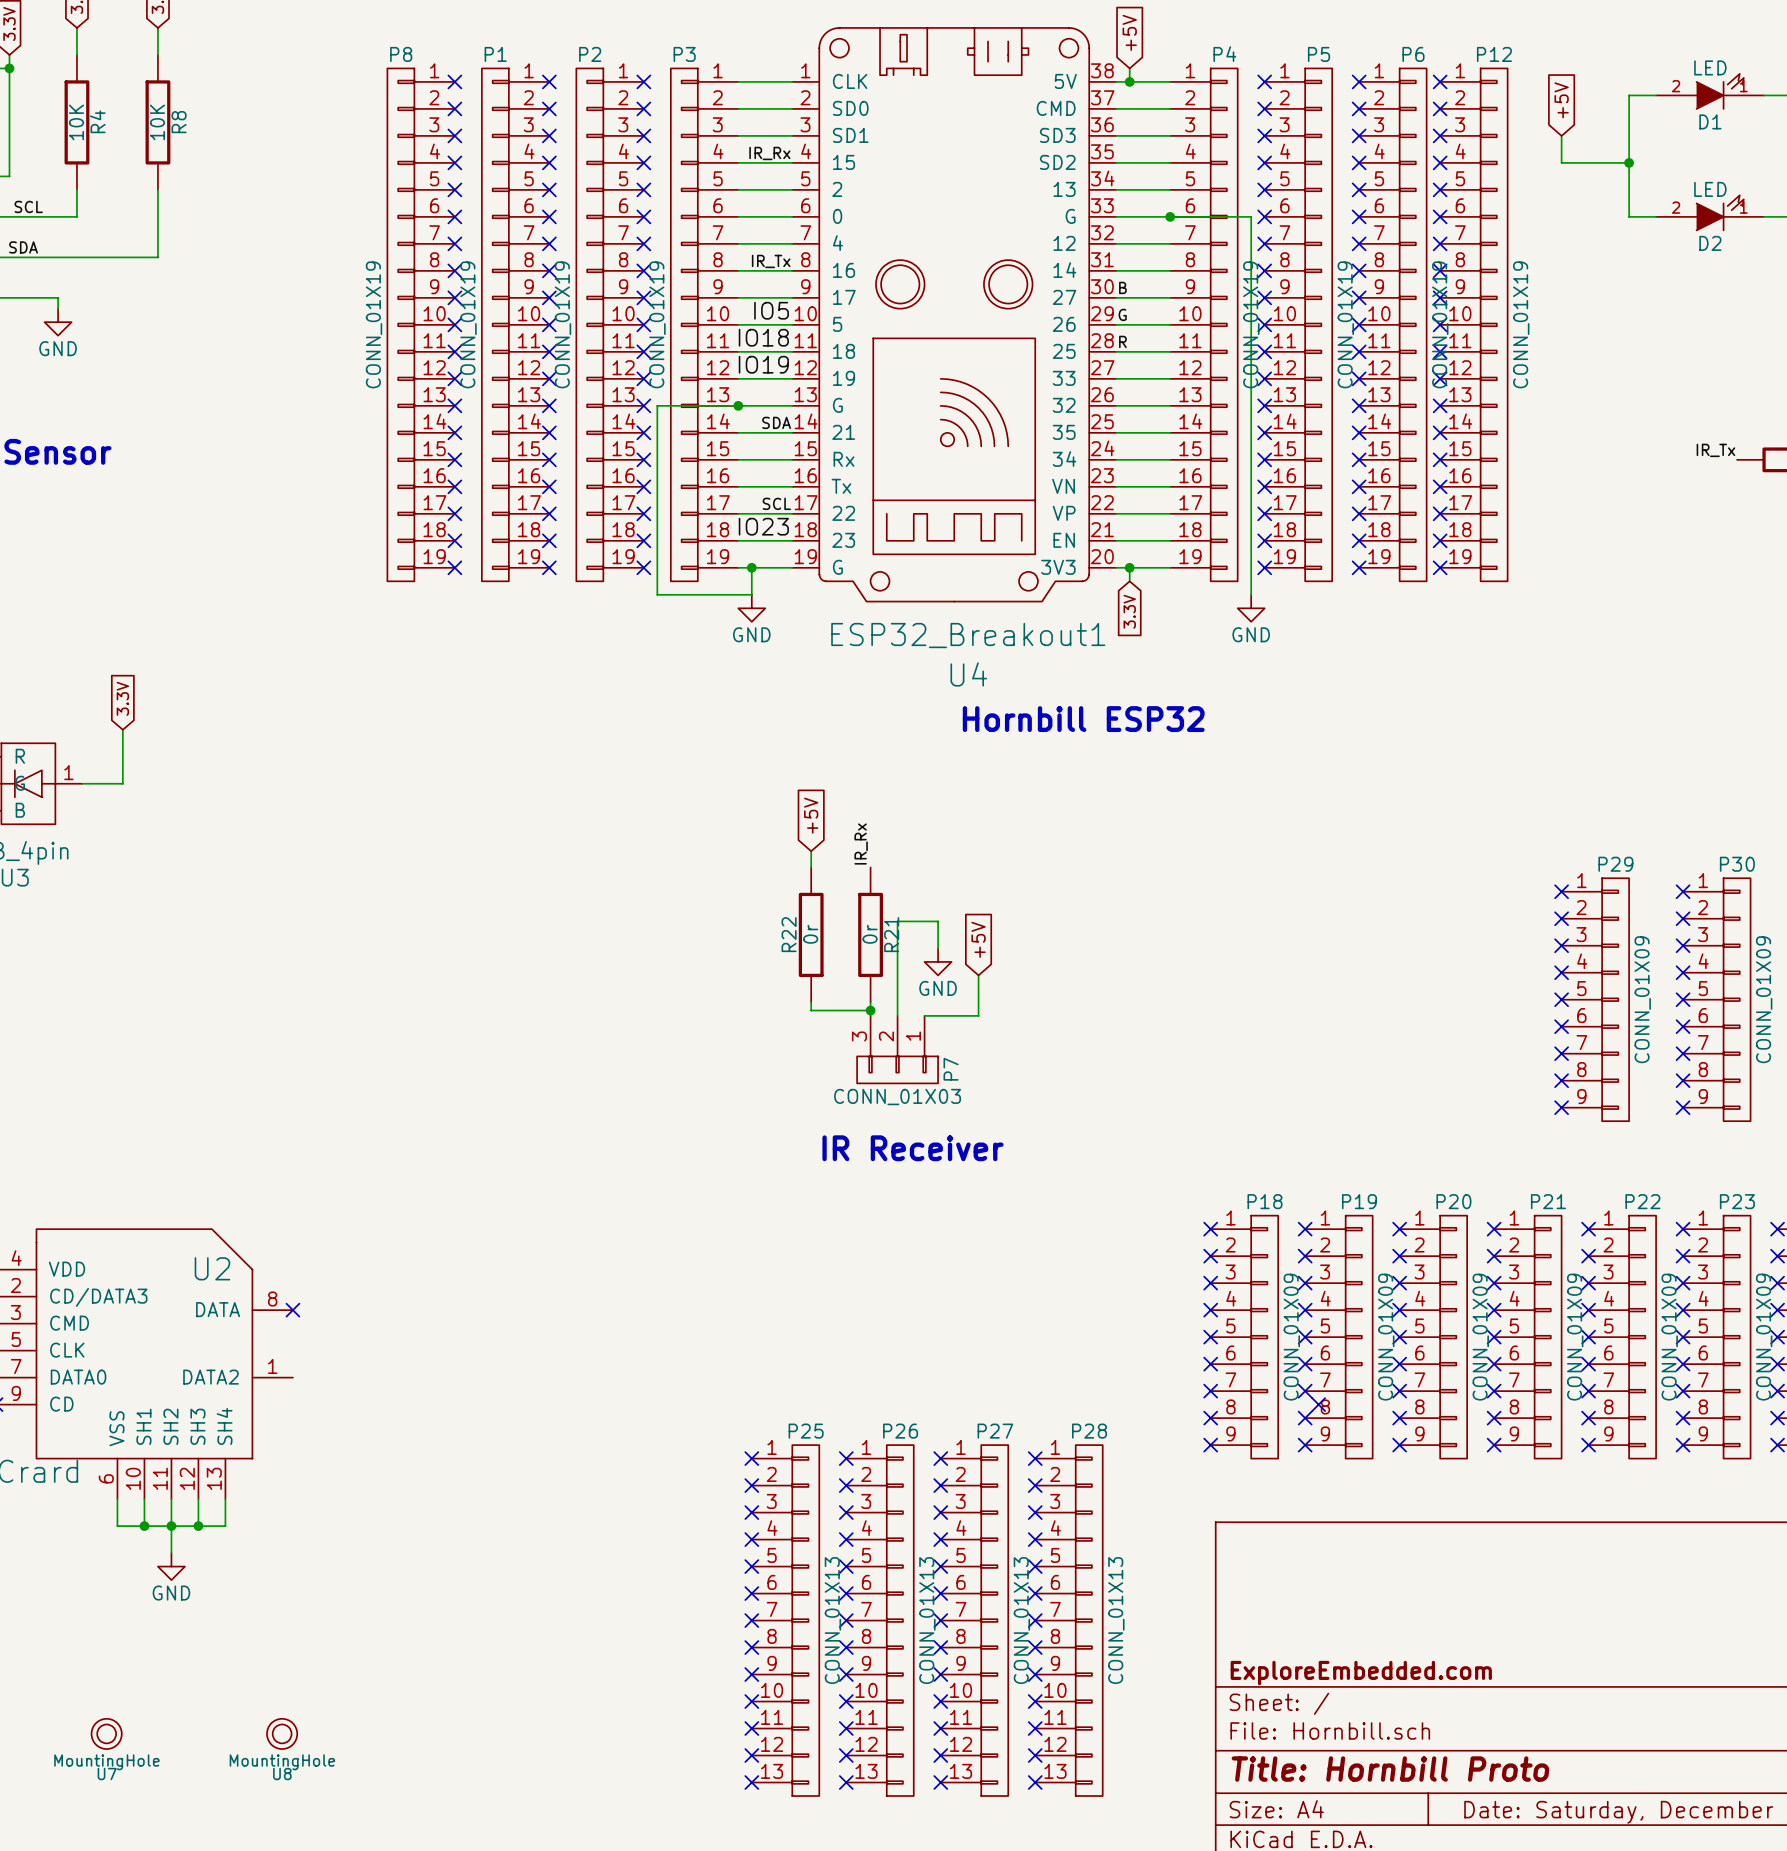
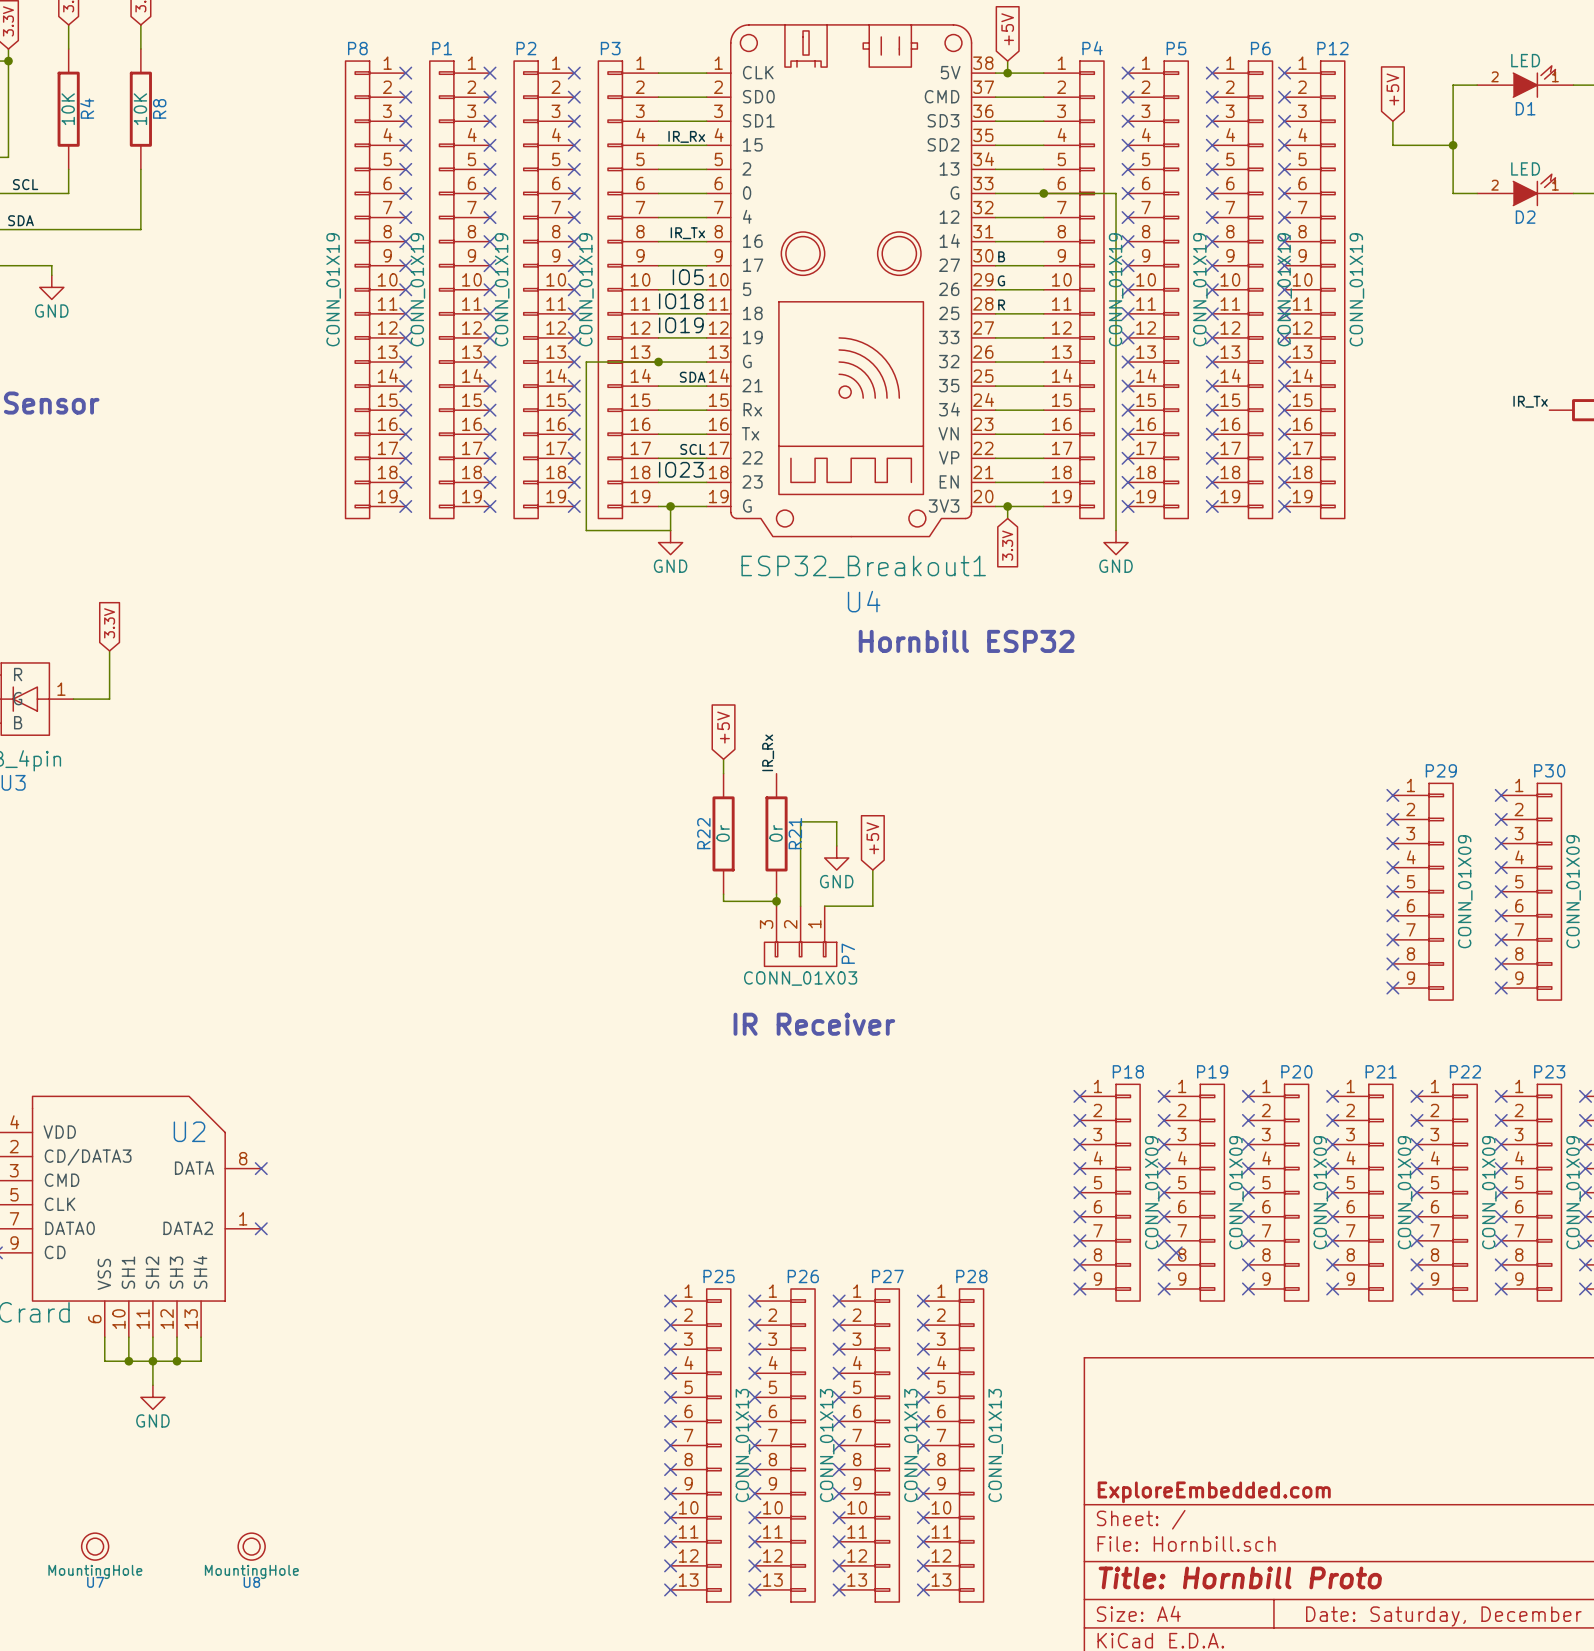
no-connect mark: none -> (261, 1228)

